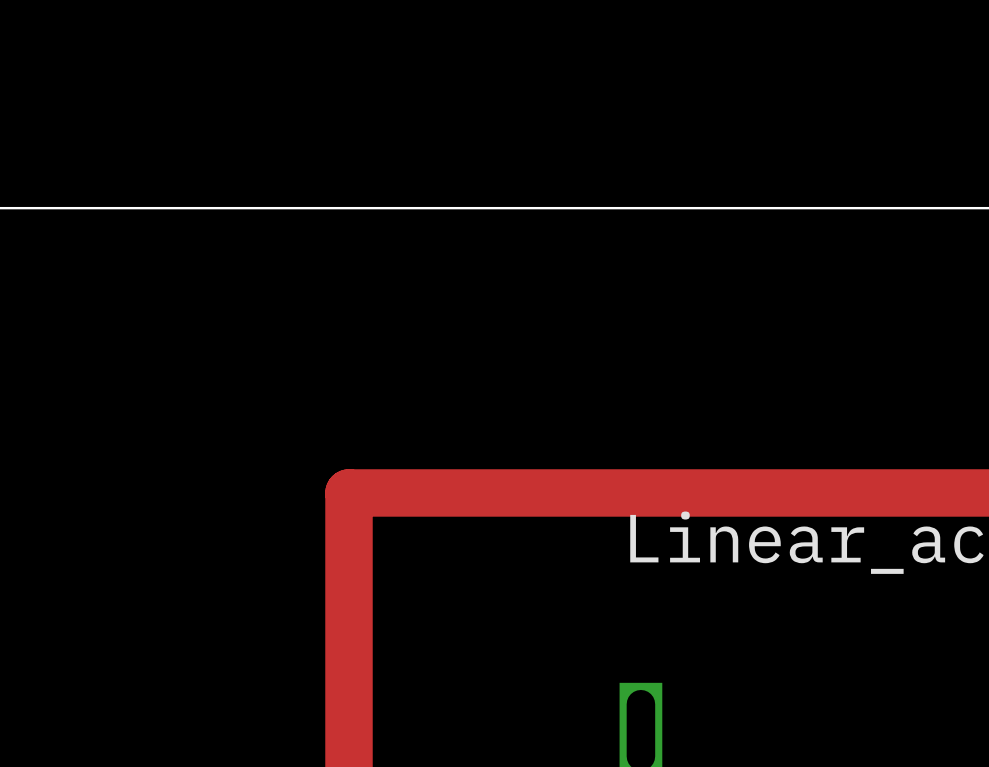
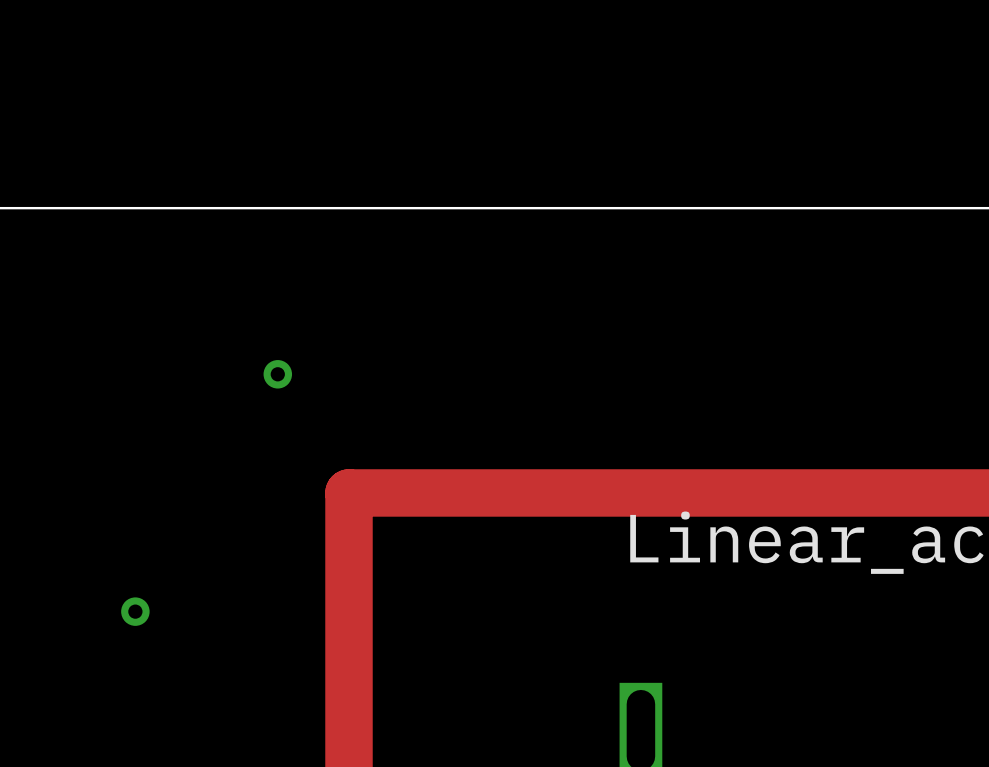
via: none -> (277, 374)
via: none -> (135, 611)

